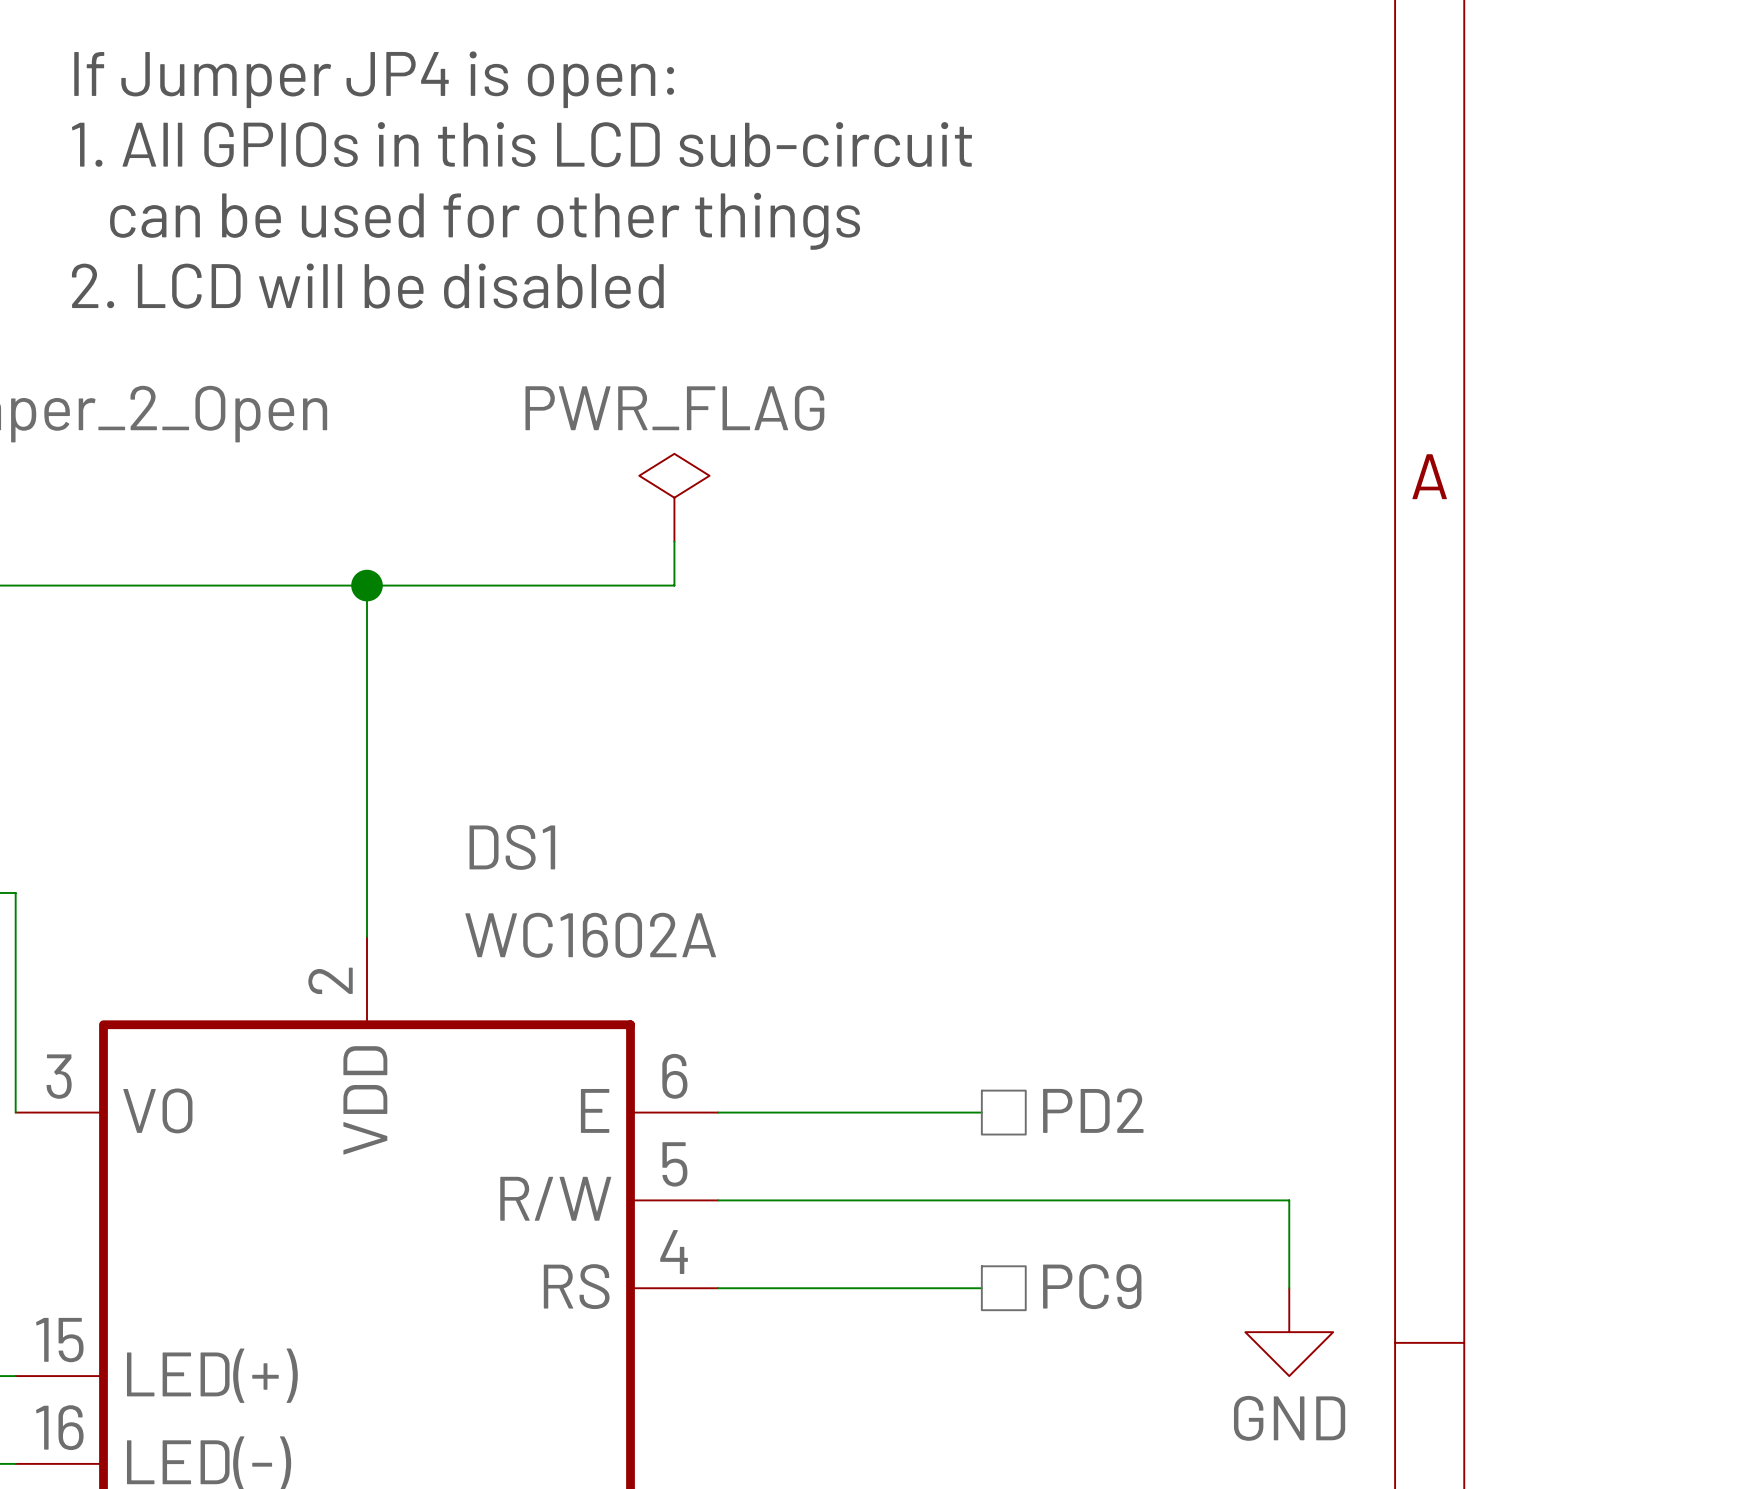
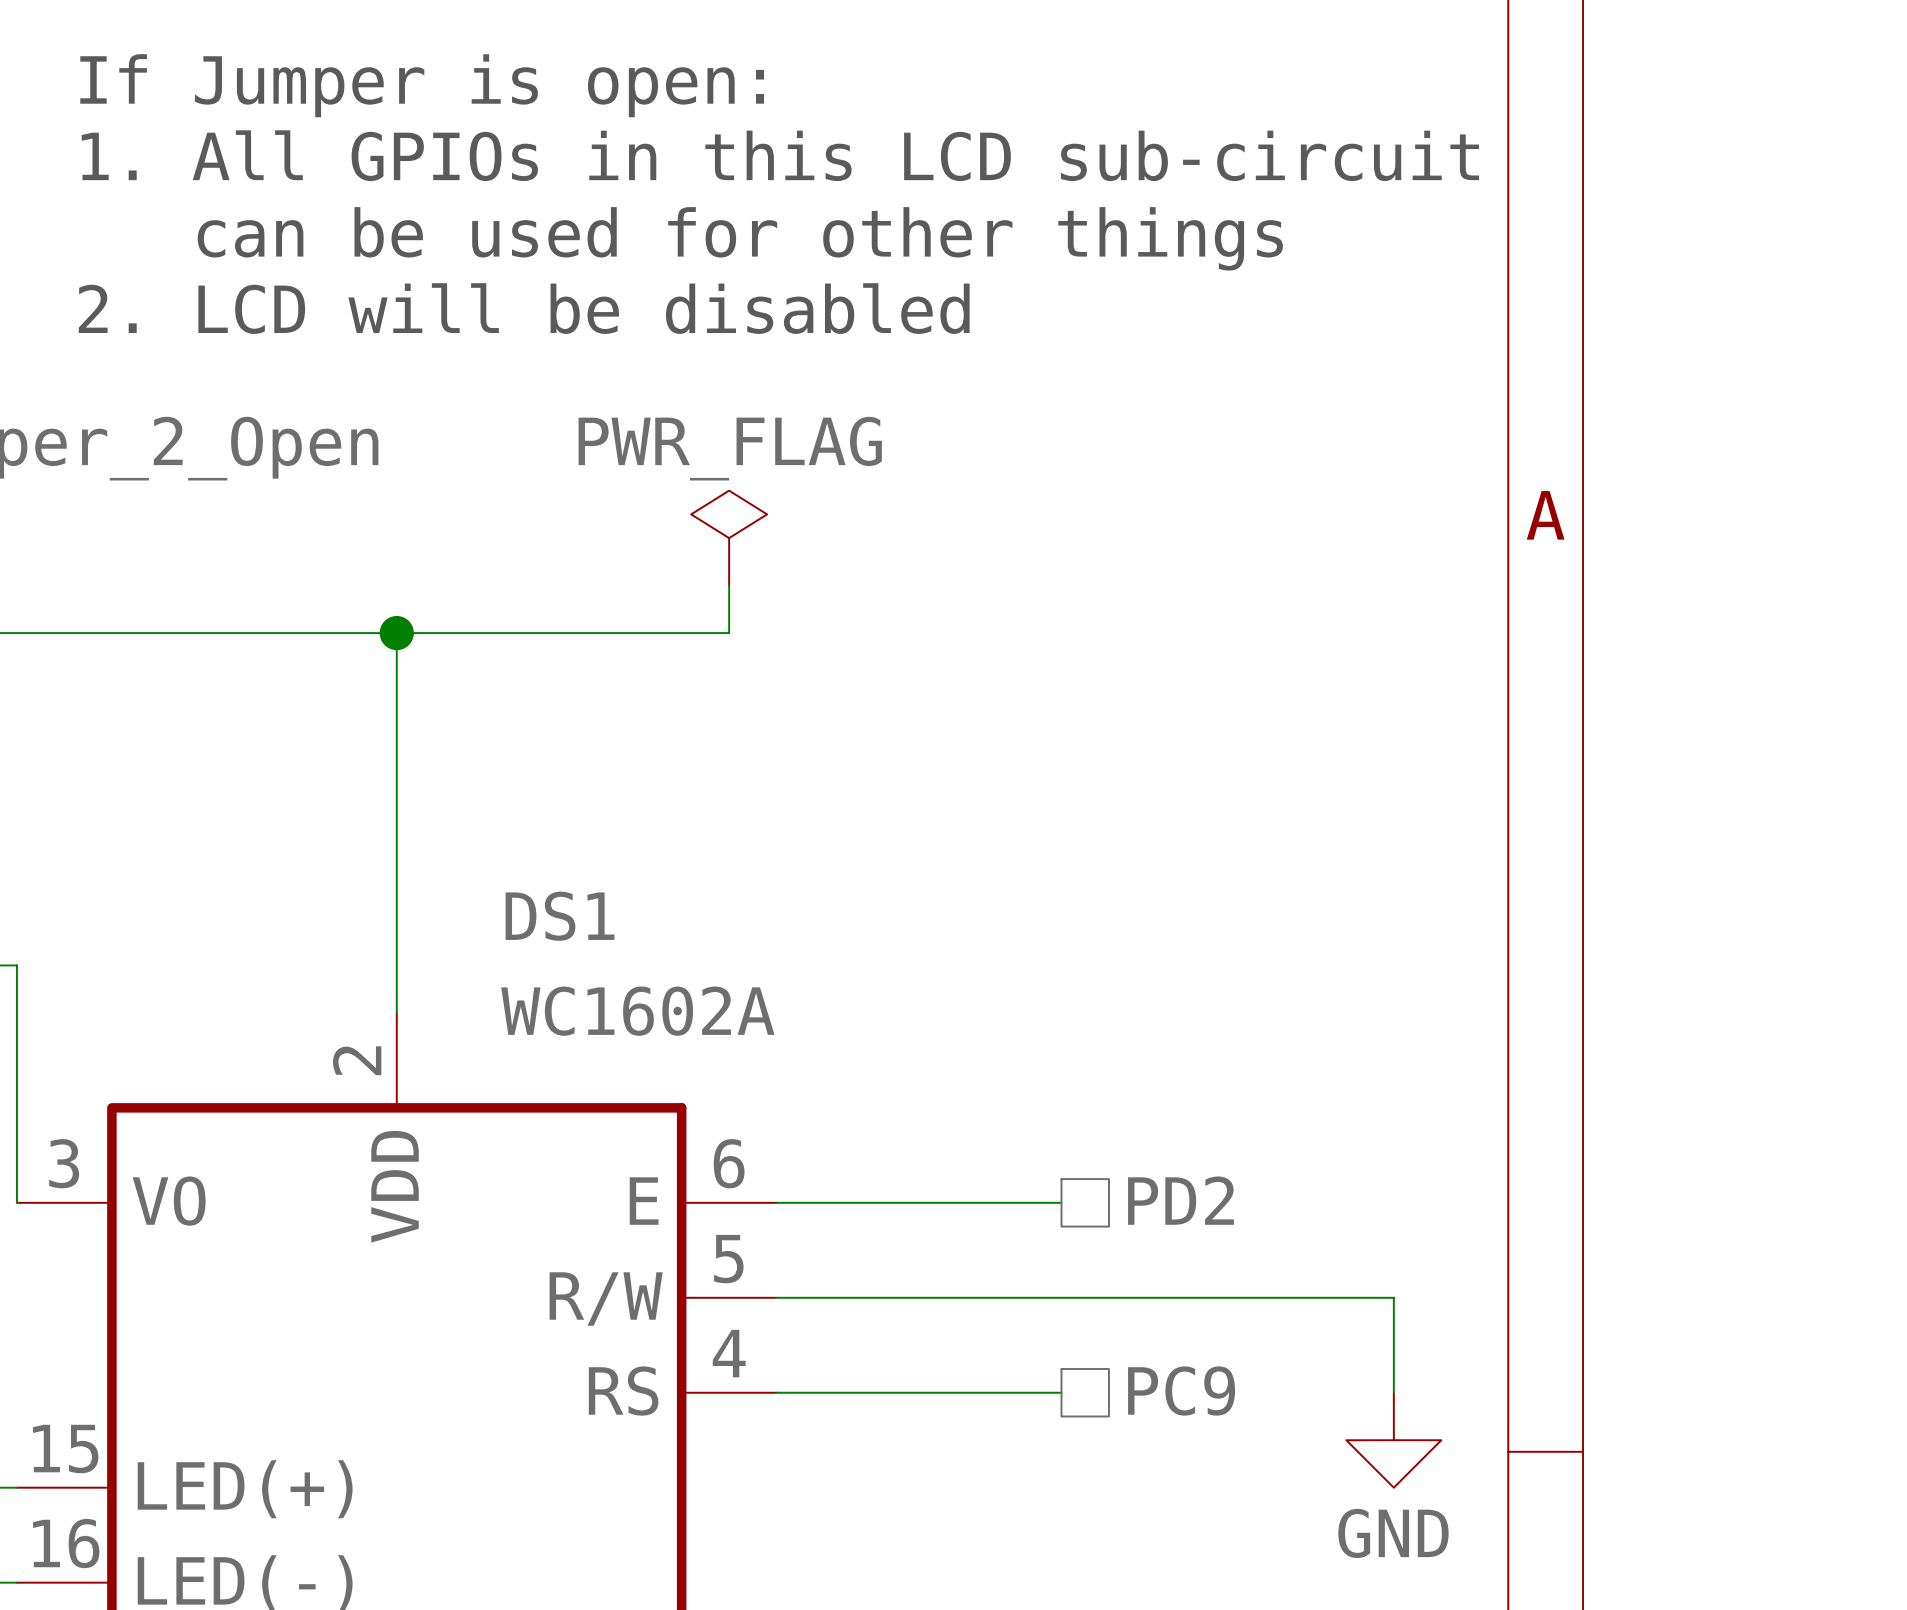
text: If Jumper JP4 is open: (374, 79) -> If Jumper is open: (422, 85)

